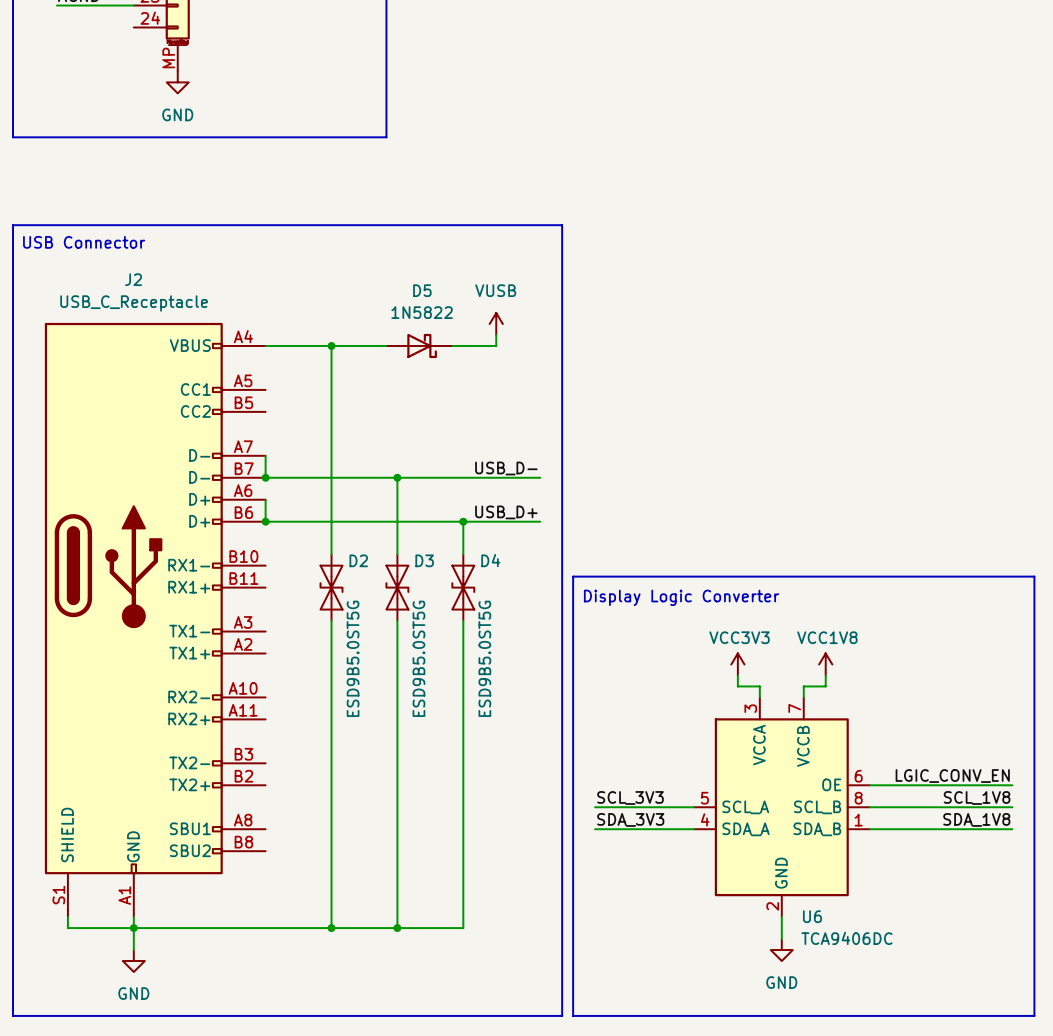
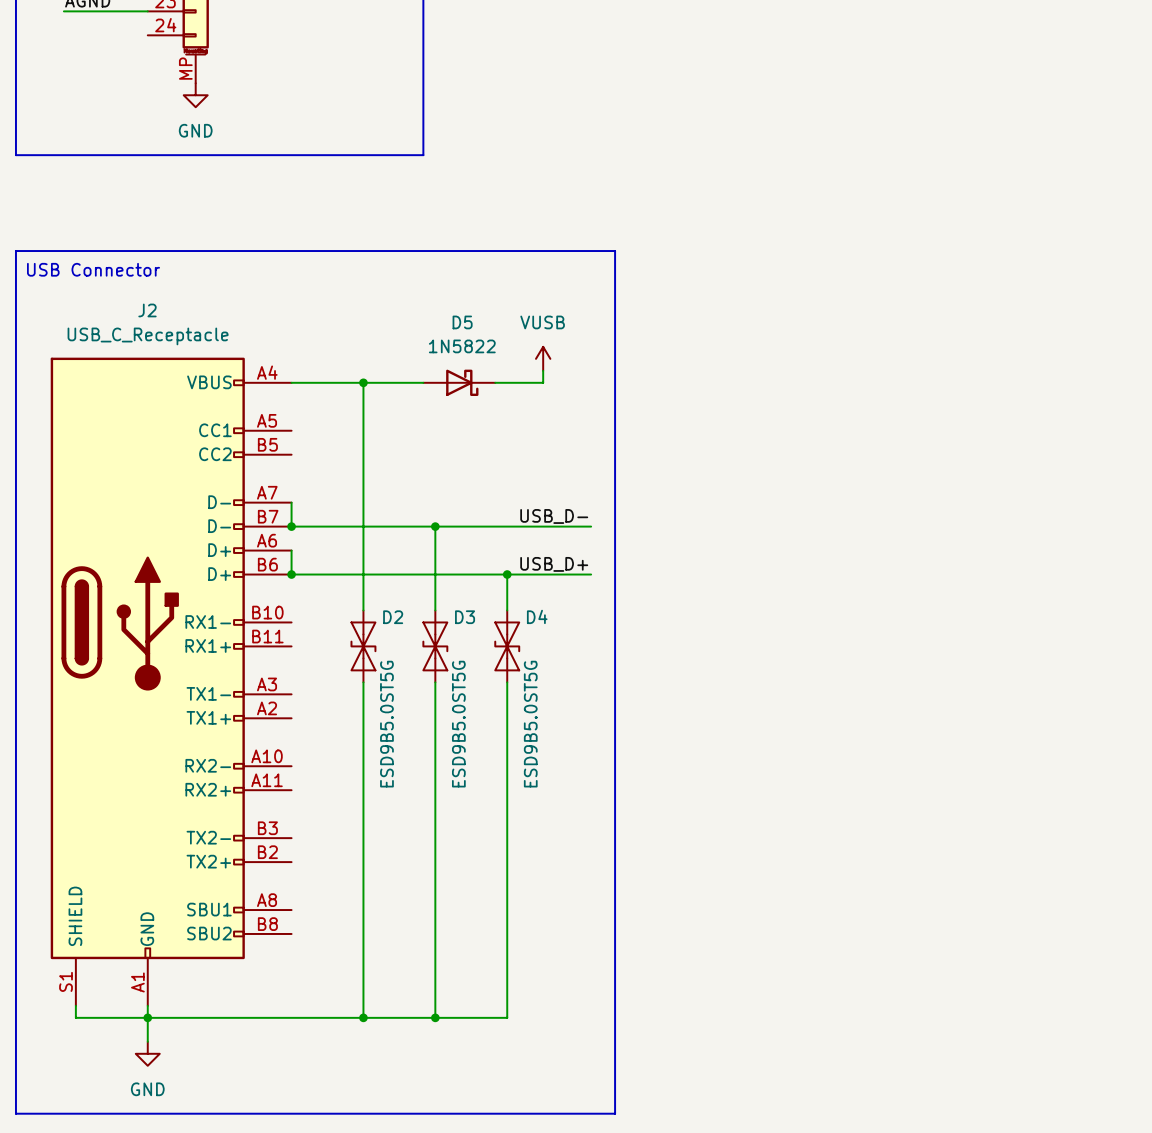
line: (573, 576) (1034, 576) (1034, 1015) (573, 1015) (573, 576) -> none
text: Display Logic Converter (681, 597) -> none
power symbol: VCC3V3 (737, 664) -> none
power symbol: VCC1V8 (825, 664) -> none
wire: (737, 675) (737, 686) (759, 686) (759, 697) -> none
wire: (825, 675) (825, 686) (803, 686) (803, 697) -> none
label: LGIC_CONV_EN (952, 776) -> none
wire: (869, 785) (1012, 785) -> none
label: SCL_3V3 (630, 797) -> none
label: SCL_1V8 (977, 797) -> none
wire: (595, 807) (693, 807) -> none
U6: TCA9406DC (781, 807) -> none
wire: (869, 807) (1012, 807) -> none
label: SDA_3V3 (630, 819) -> none
label: SDA_1V8 (976, 819) -> none
wire: (595, 829) (693, 829) -> none
wire: (869, 829) (1012, 829) -> none
wire: (781, 917) (781, 939) -> none
power symbol: GND (781, 950) -> none

